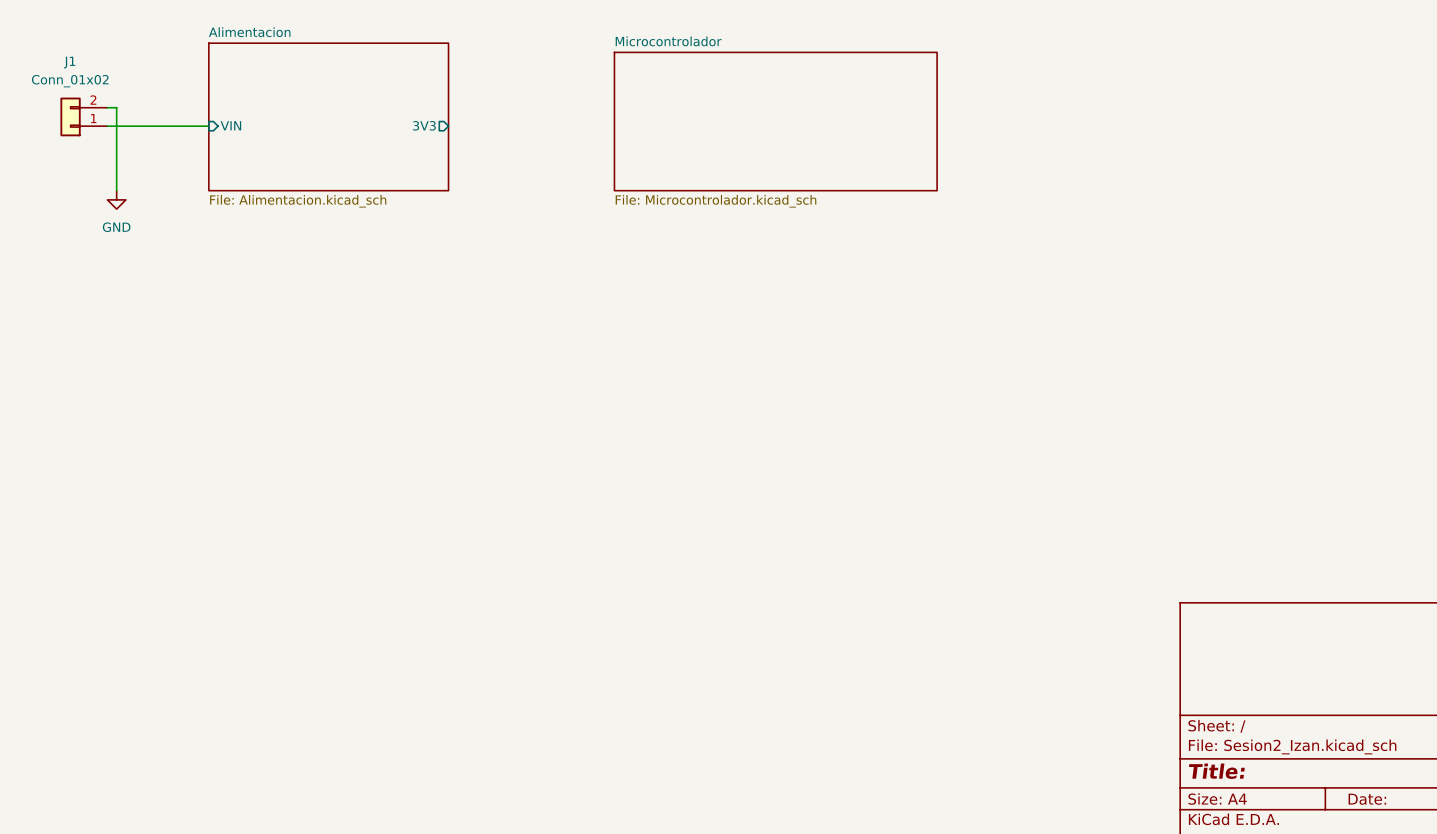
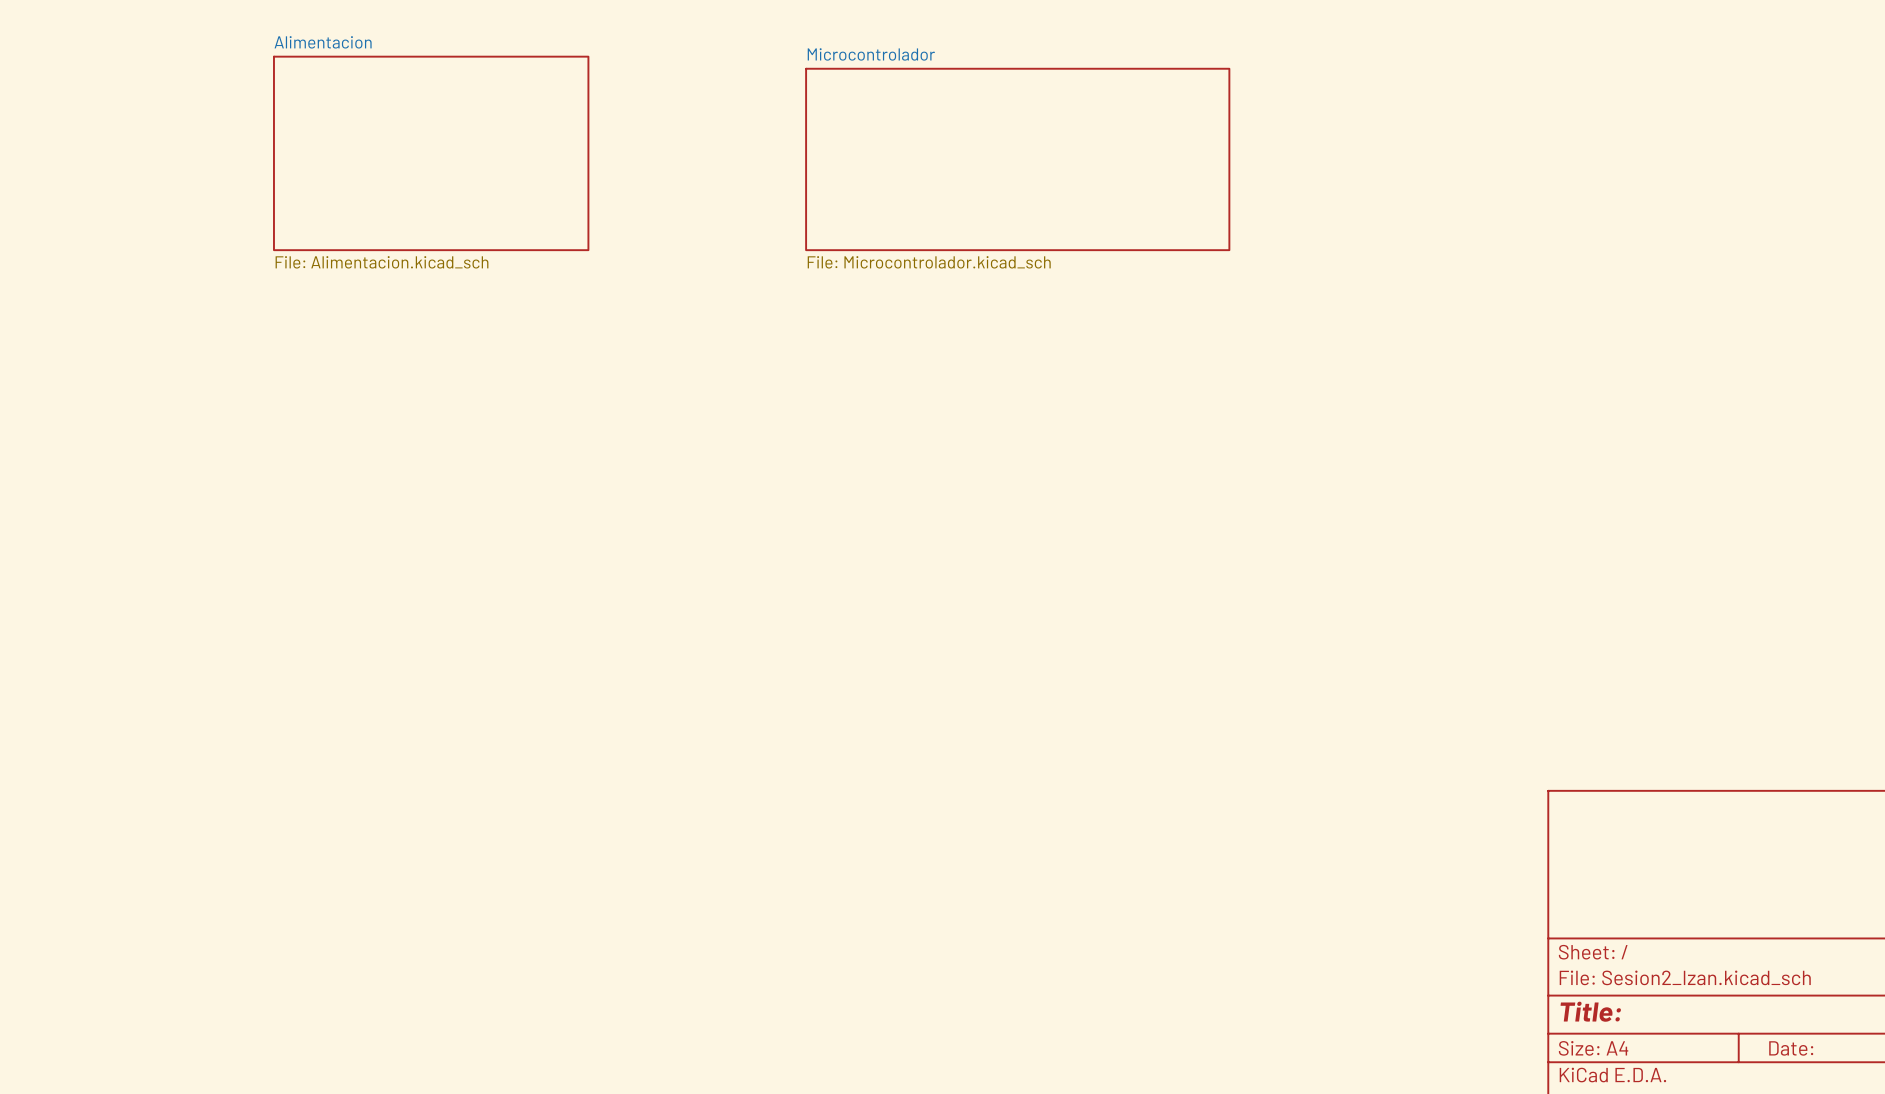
wire: (107, 107) (116, 107) (116, 190) -> none
J1: Conn_01x02 (83, 116) -> none
sheet pin: VIN (230, 125) -> none
sheet pin: 3V3 (424, 125) -> none
wire: (107, 126) (208, 126) -> none
power symbol: GND (116, 199) -> none

